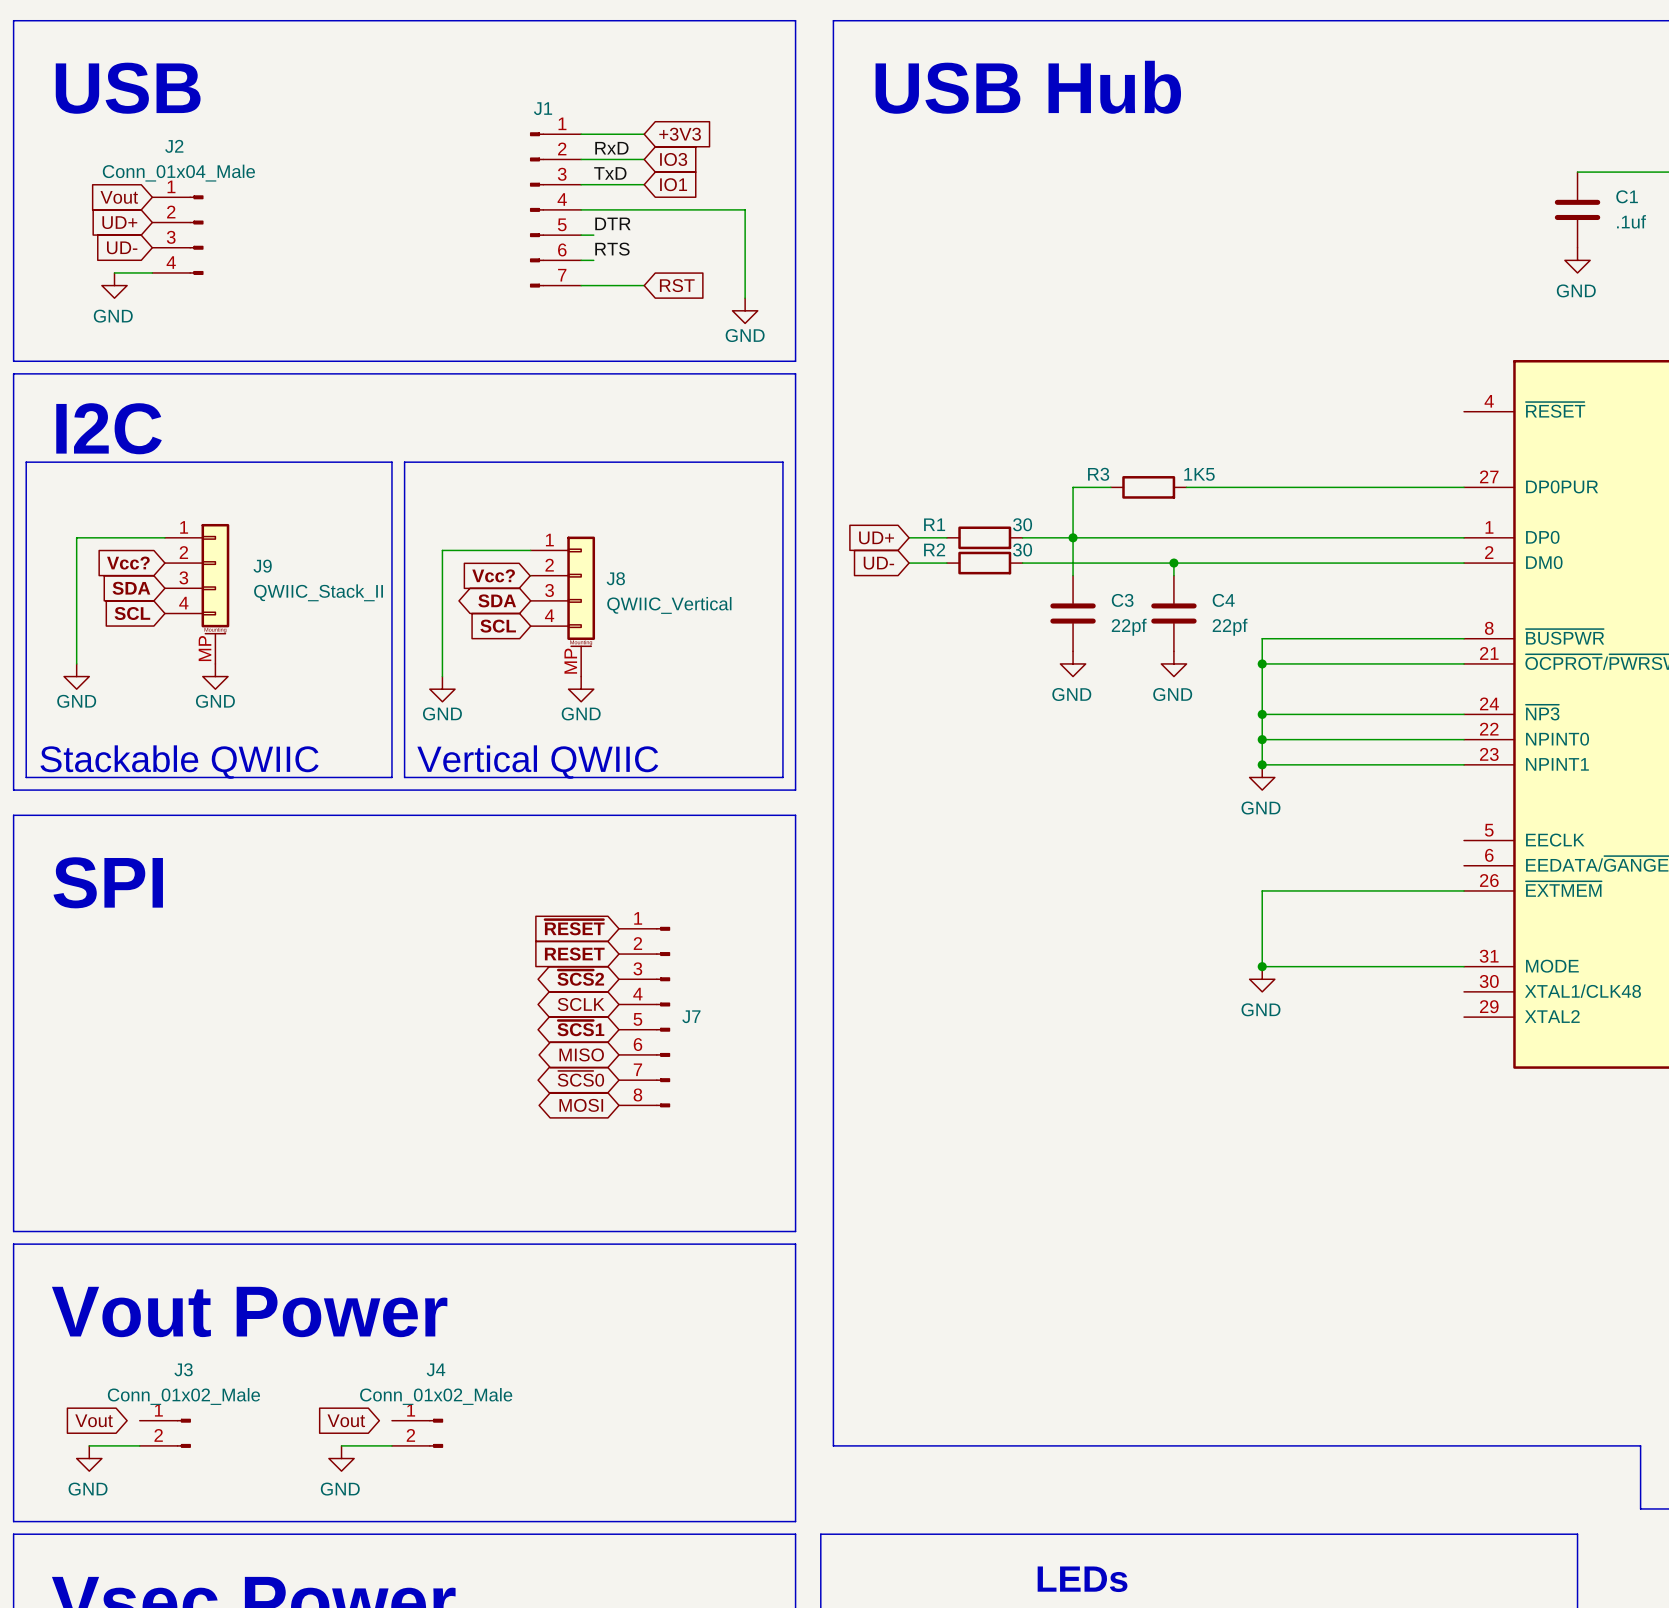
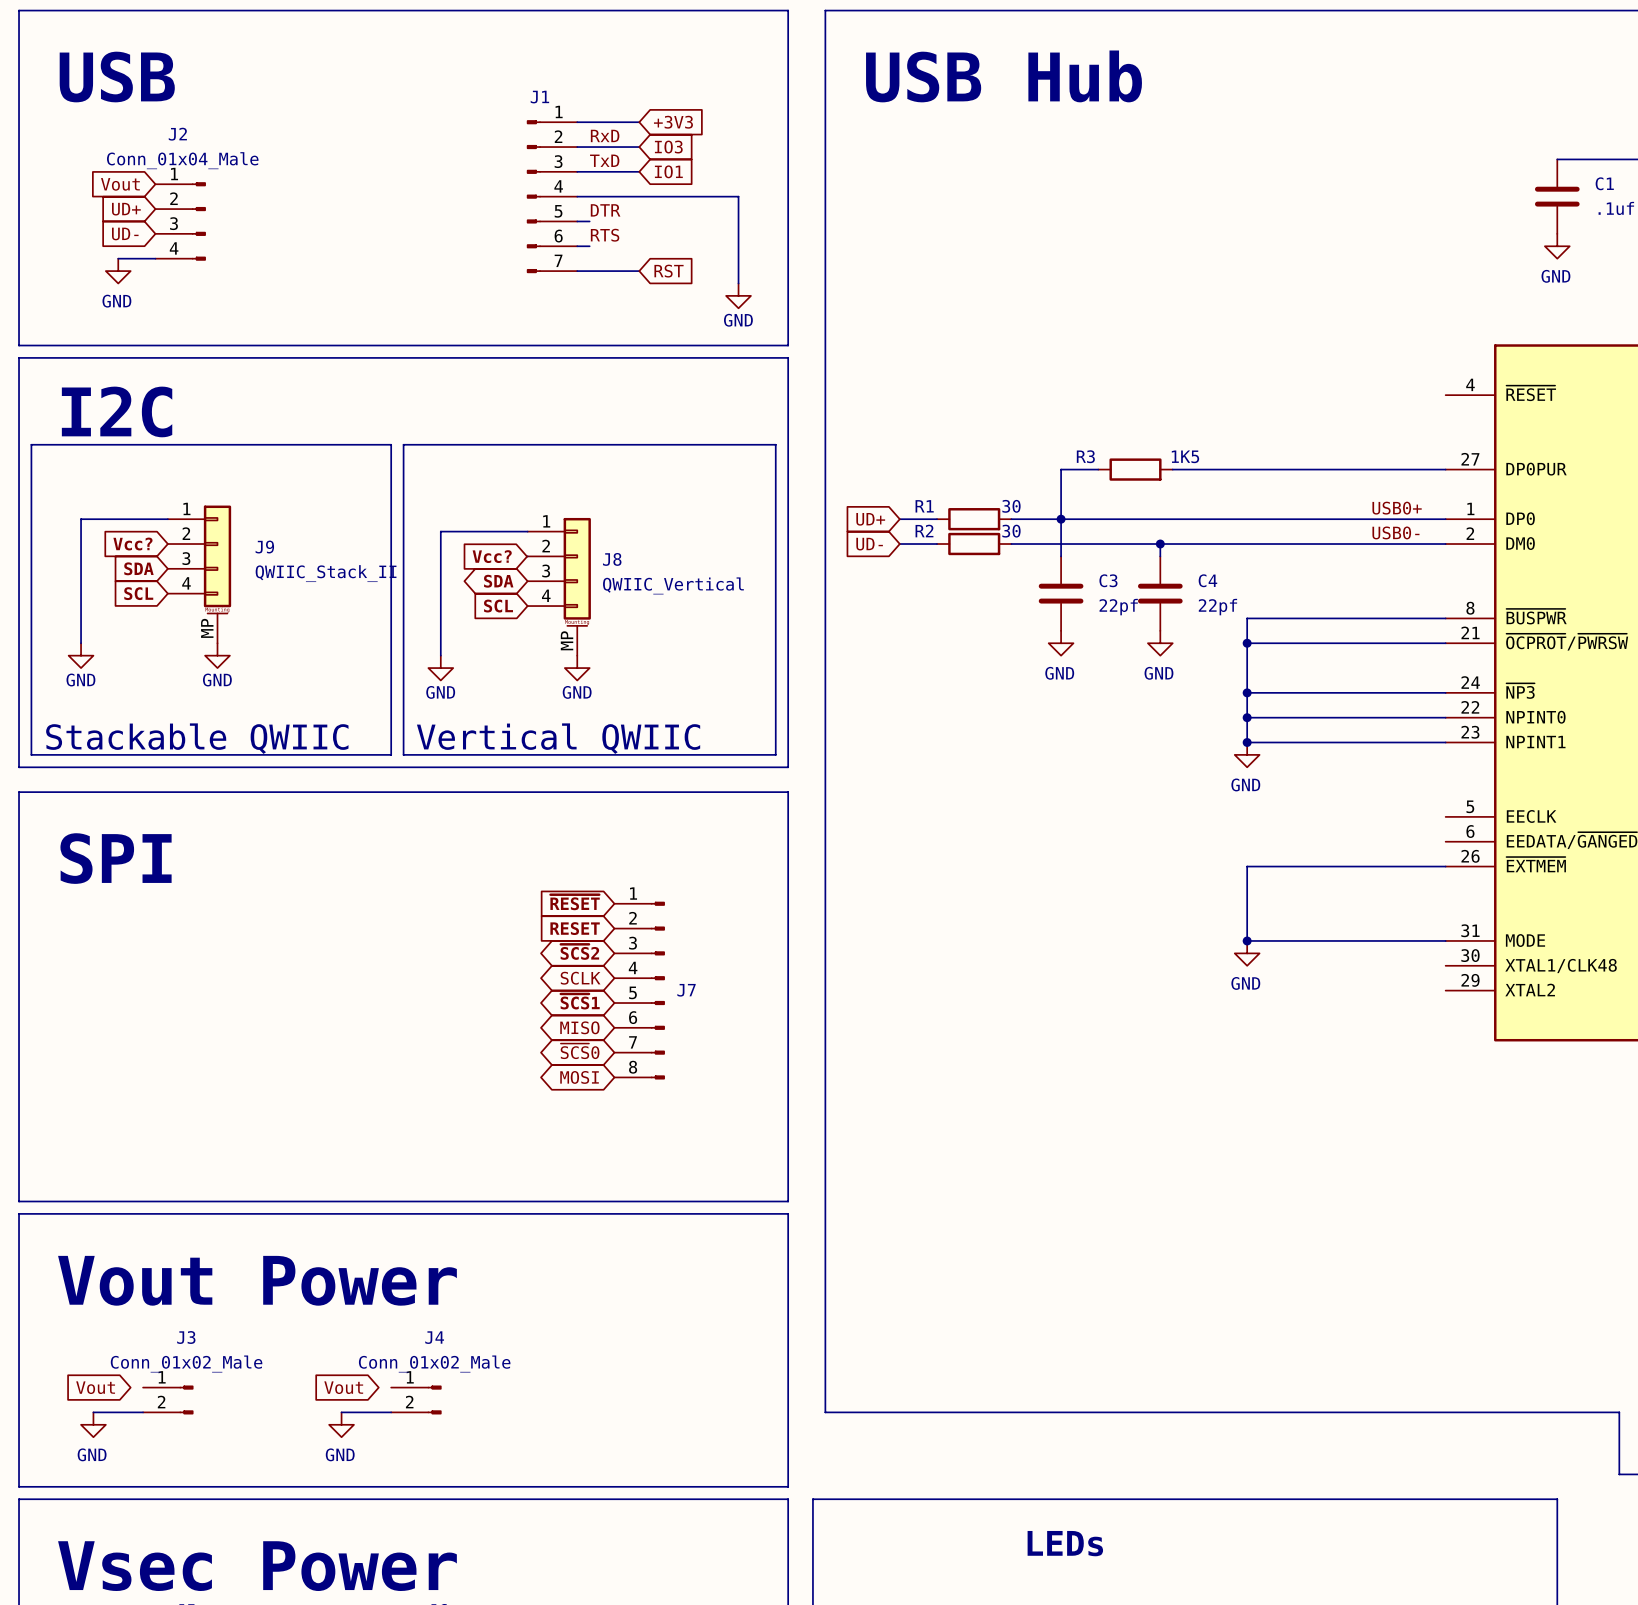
label: none -> USB0+ (1397, 508)
label: none -> USB0- (1395, 532)

